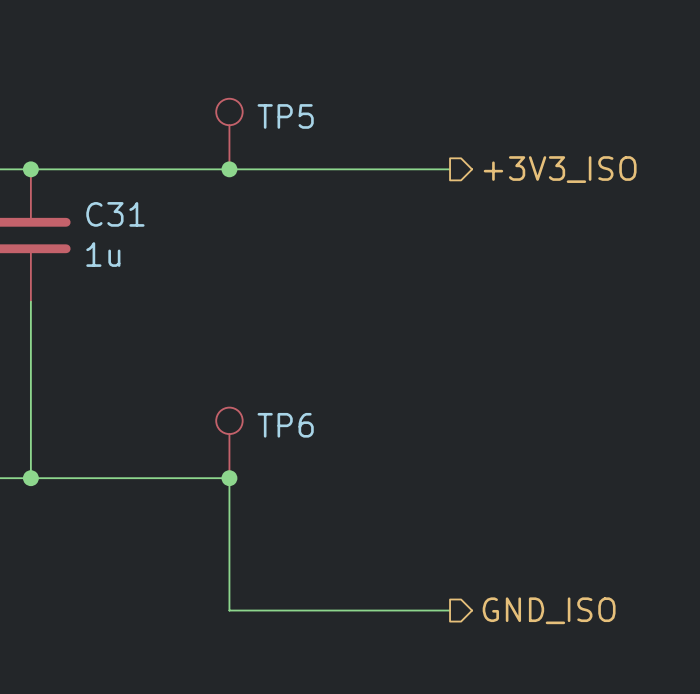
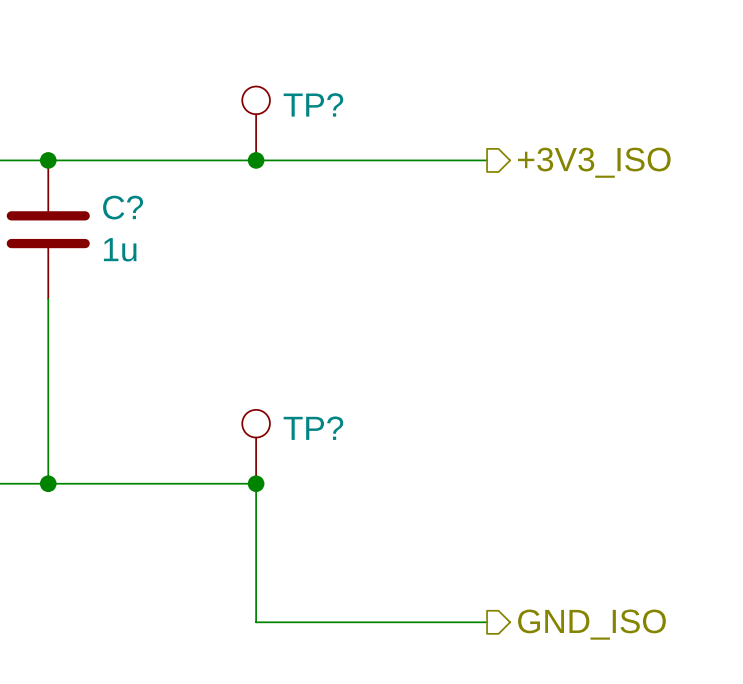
TP5 name: TP5 (285, 116) -> TP? (313, 104)
C31 name: C31 (115, 214) -> C? (123, 207)
TP6 name: TP6 (285, 425) -> TP? (313, 428)

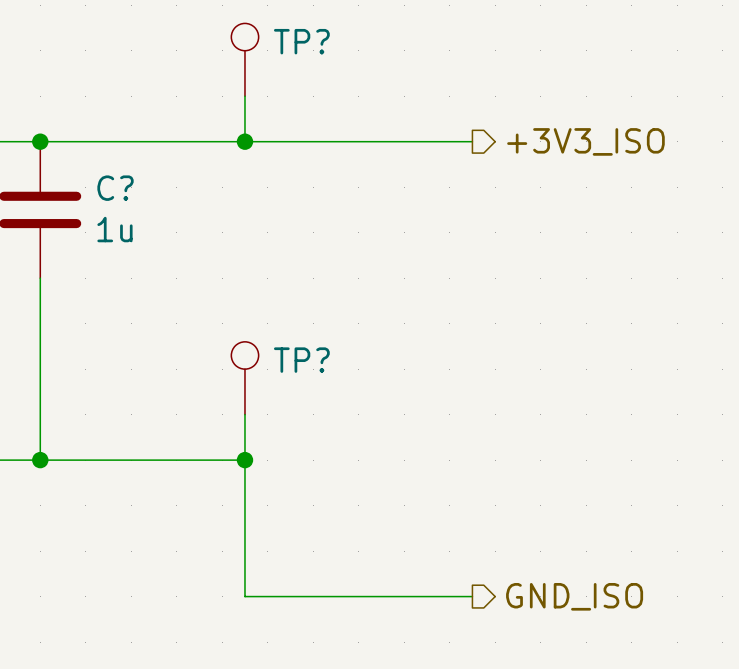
TP? position: (256, 123) -> (244, 59)
TP? position: (256, 446) -> (244, 378)

